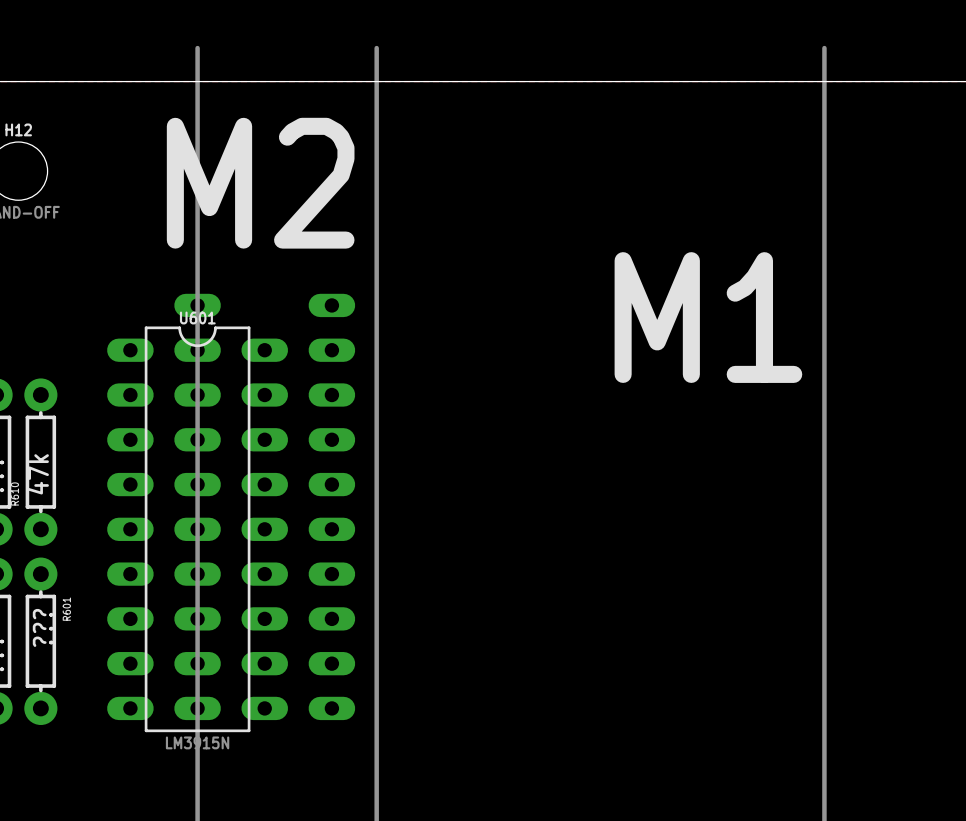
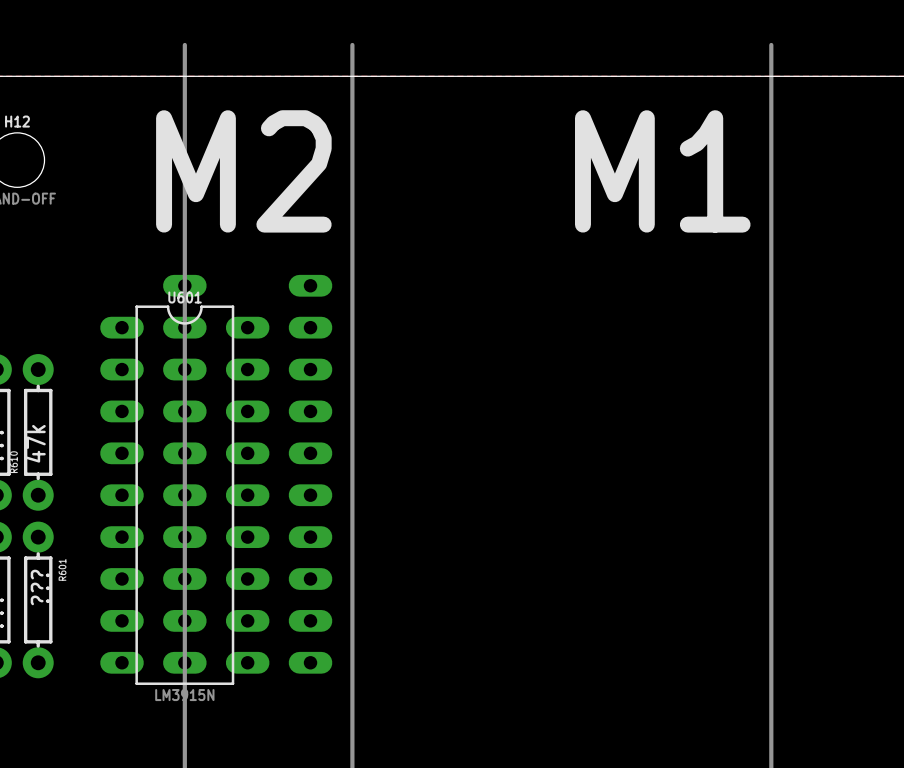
text position: M1 (708, 317) -> M1 (662, 171)

